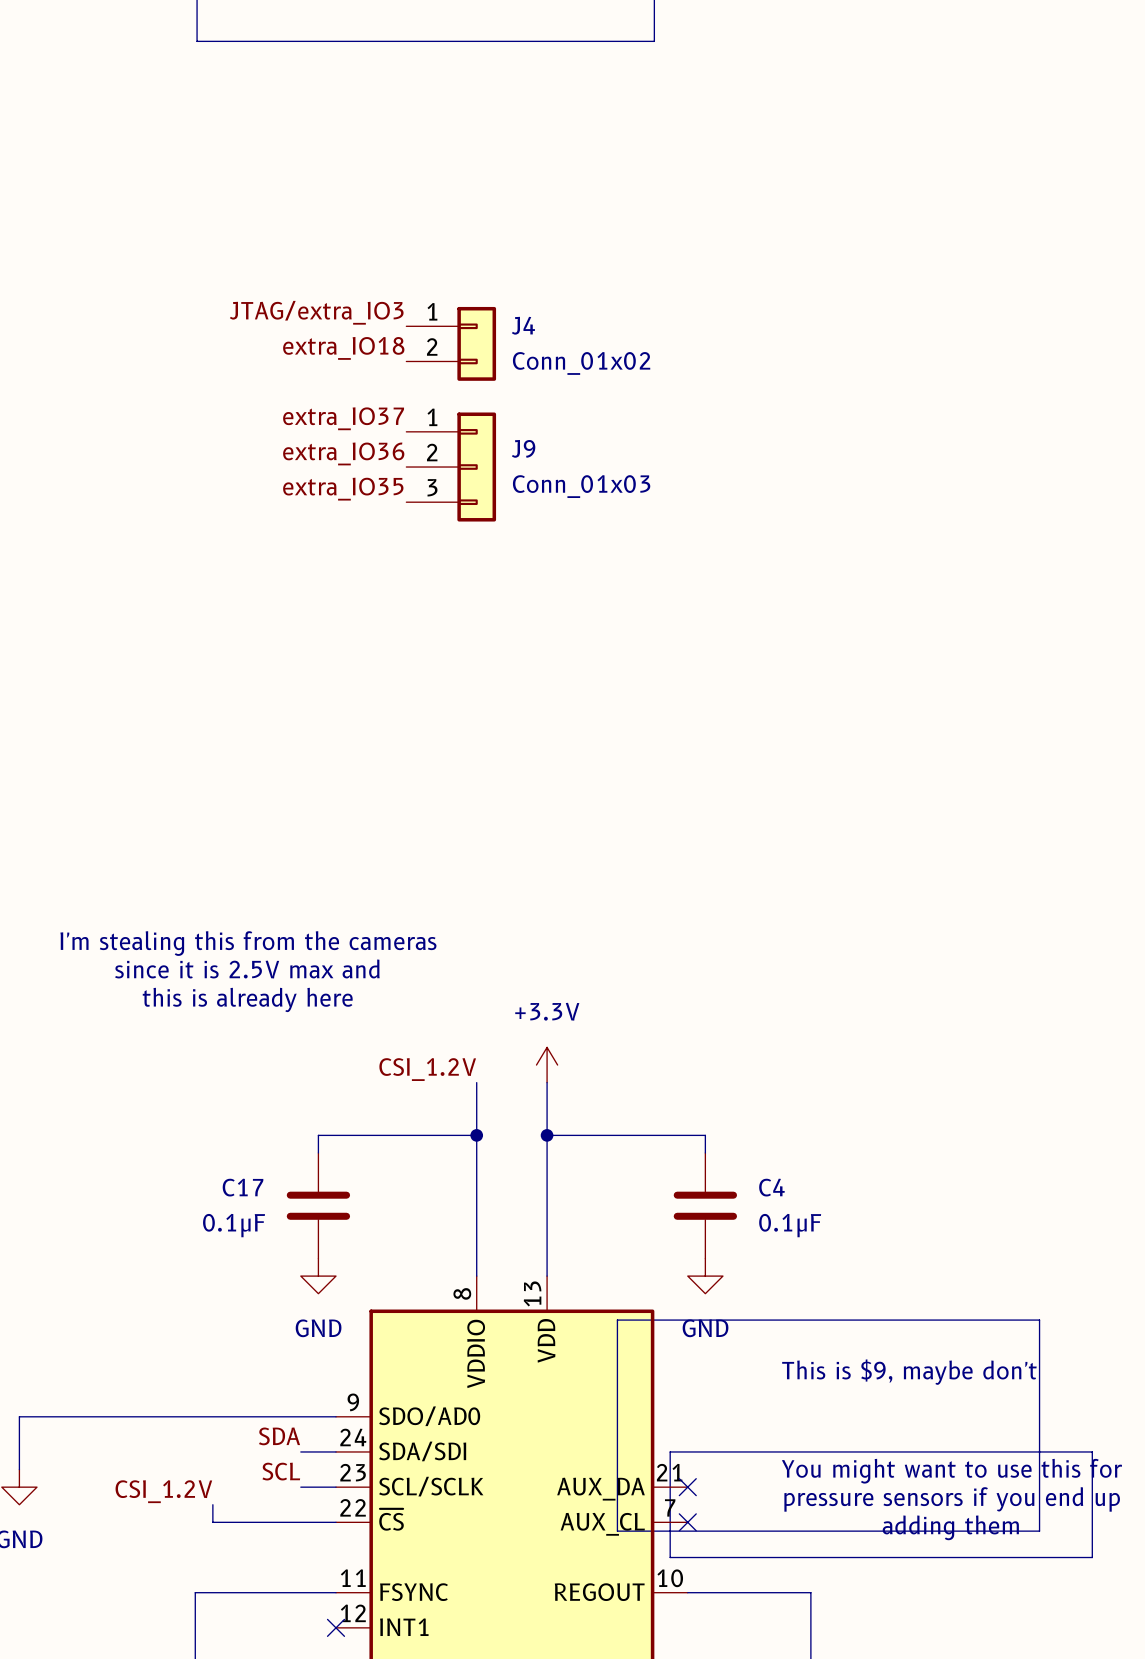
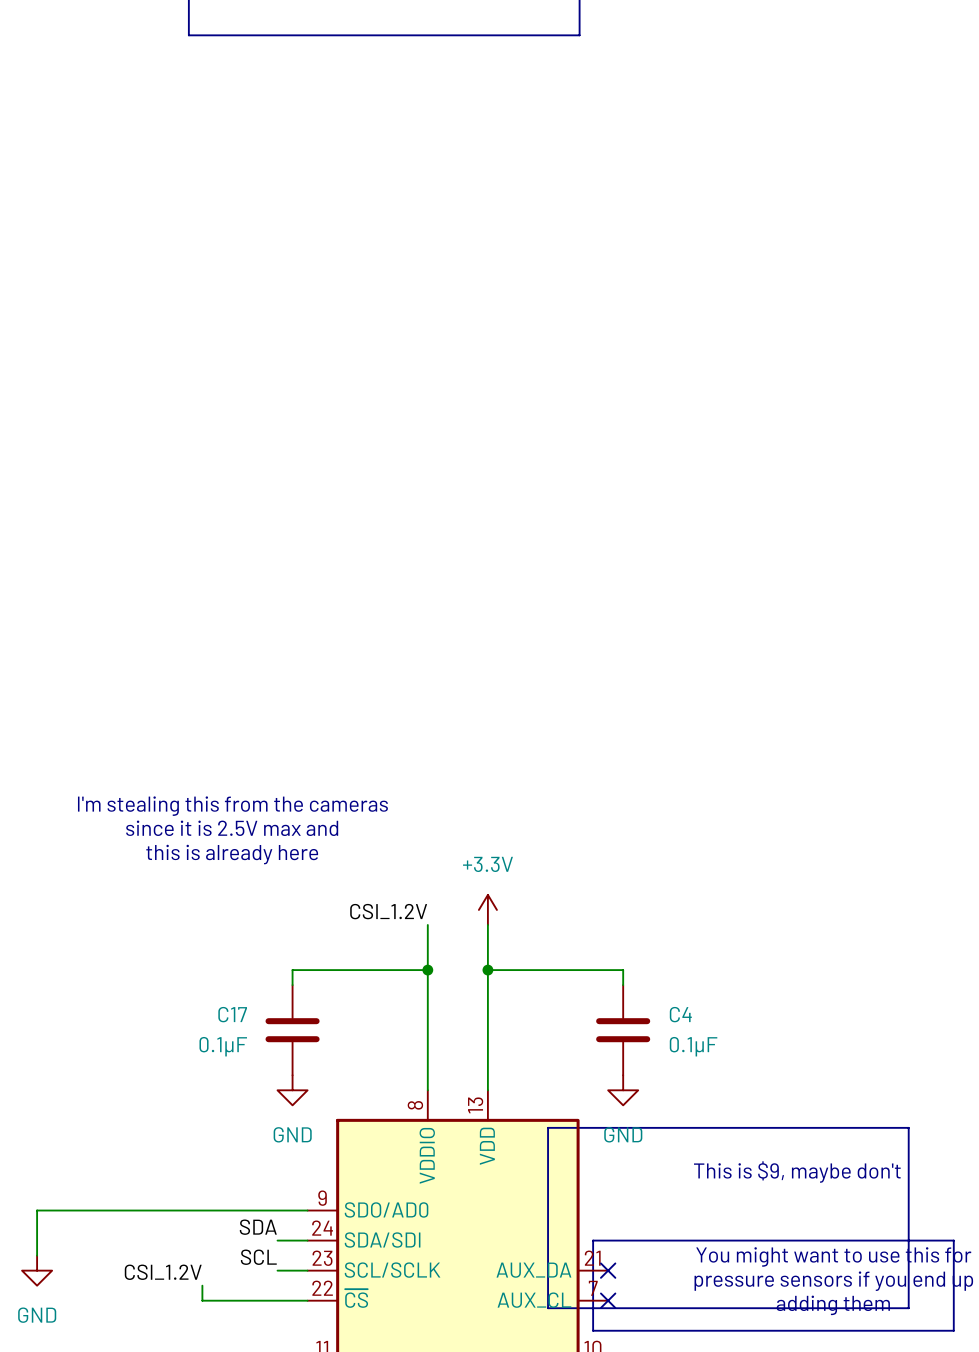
label: JTAG/extra_IO3 (316, 312) -> none
J4: Conn_01x02 (451, 343) -> none
label: extra_IO18 (343, 348) -> none
label: extra_IO37 (343, 418) -> none
label: extra_IO36 (343, 453) -> none
J9: Conn_01x03 (451, 467) -> none
label: extra_IO35 (343, 489) -> none

